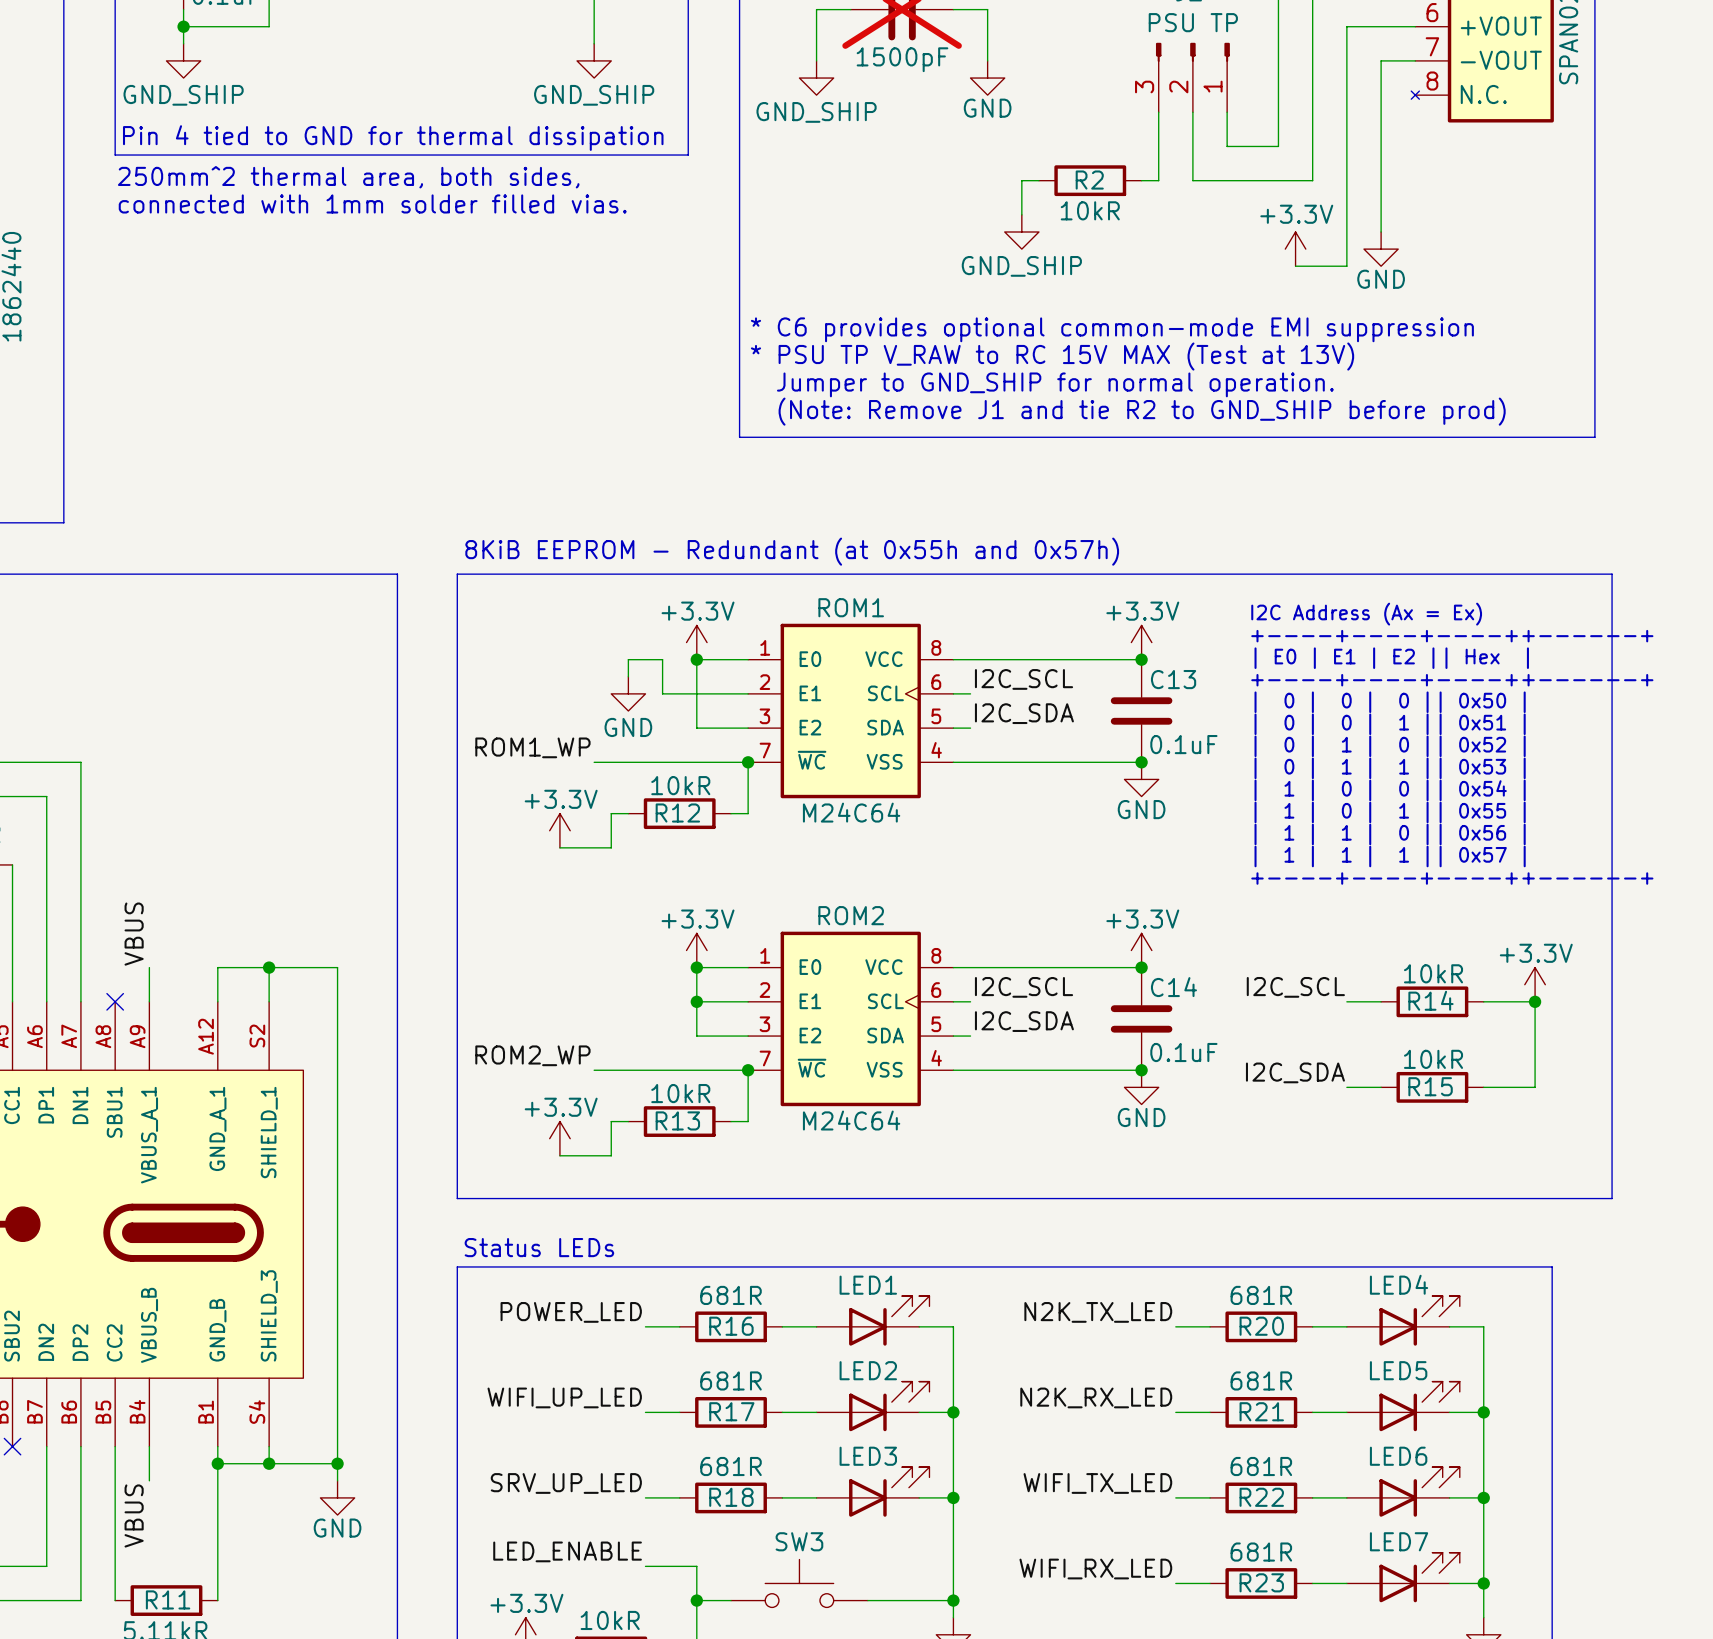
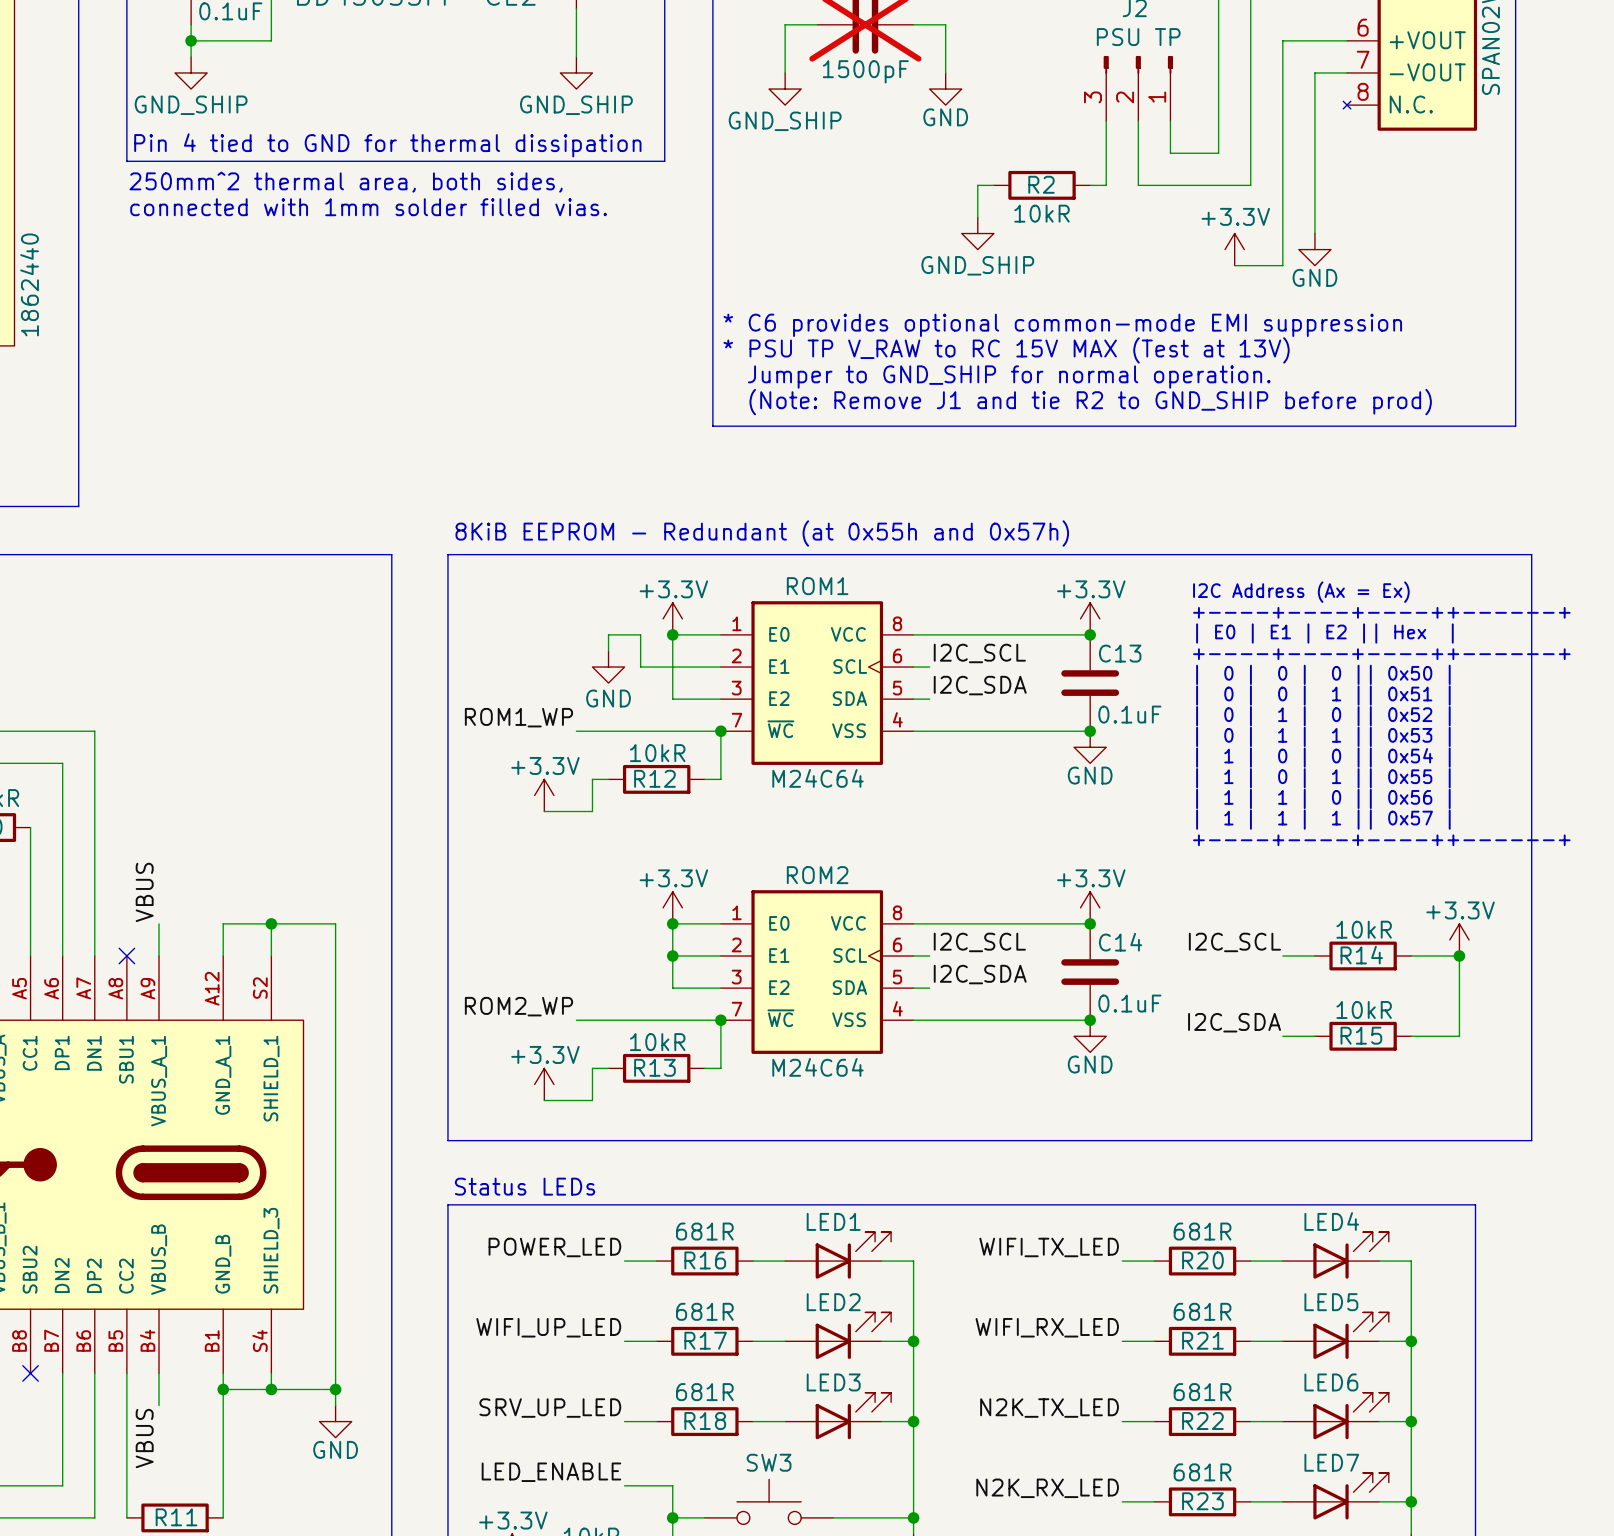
label: N2K_TX_LED (1098, 1312) -> WIFI_TX_LED (1049, 1247)
label: N2K_RX_LED (1096, 1397) -> WIFI_RX_LED (1047, 1327)
label: WIFI_TX_LED (1097, 1483) -> N2K_TX_LED (1049, 1408)
label: WIFI_RX_LED (1095, 1569) -> N2K_RX_LED (1047, 1488)

